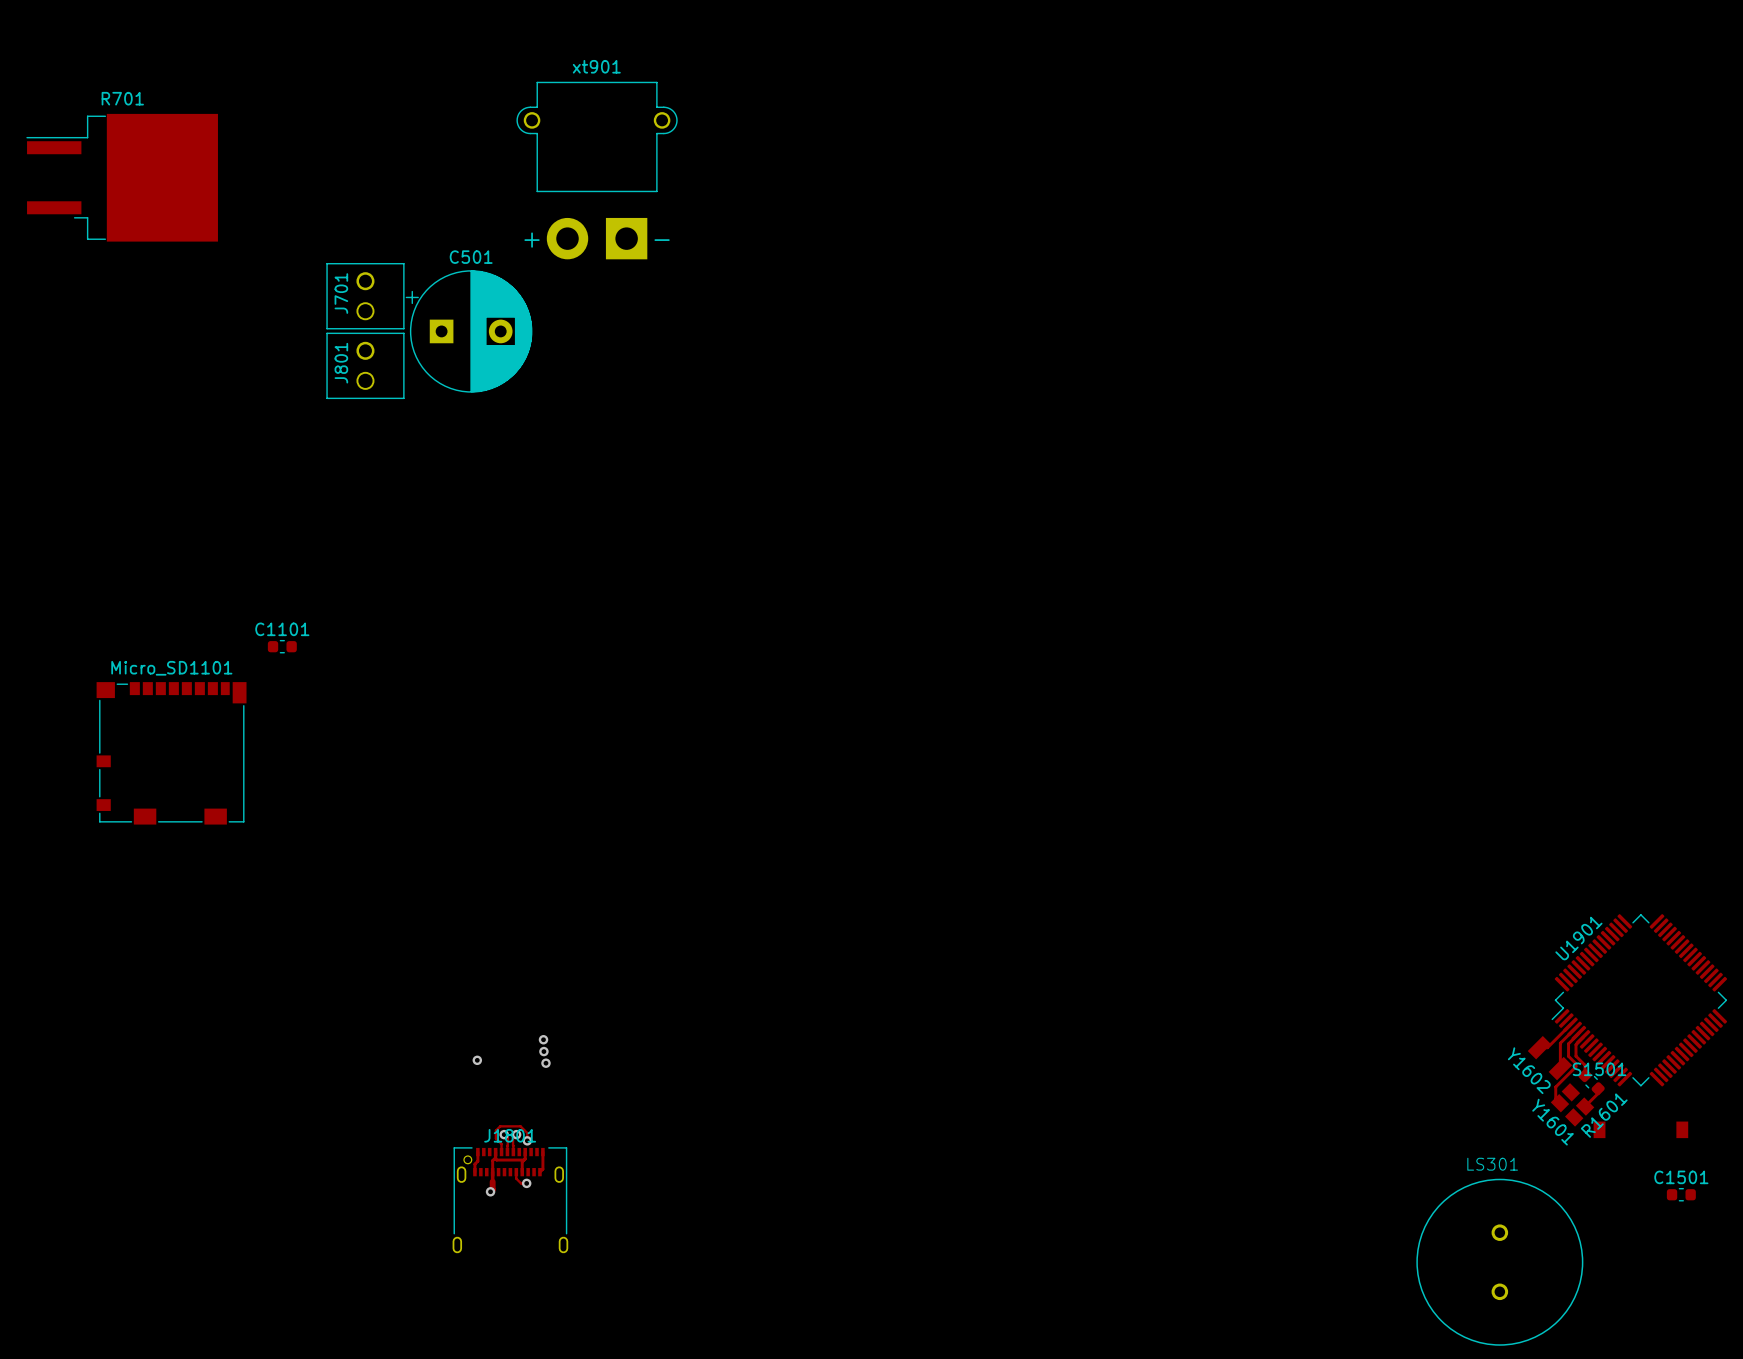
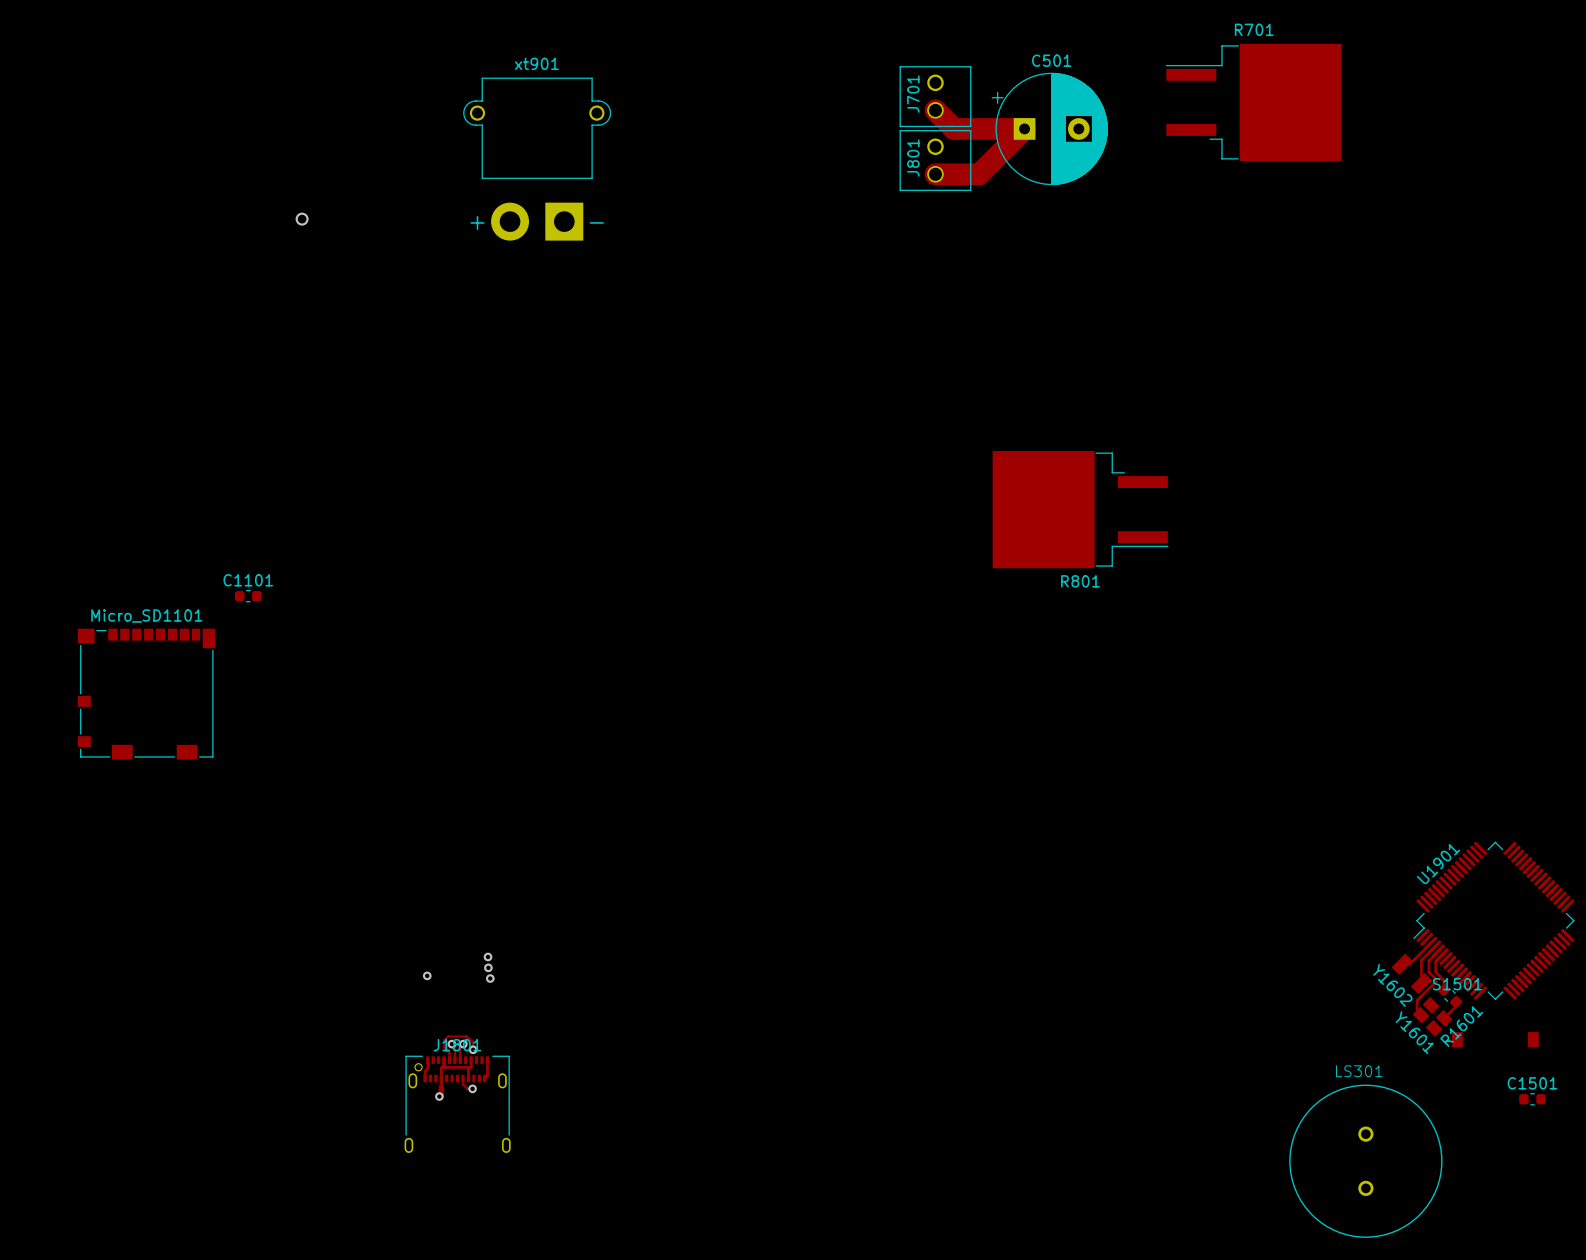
track: none -> (935, 110) (954, 128) (1024, 128) (979, 174) (935, 174)
R701 position: (122, 177) -> (1253, 102)
via: none -> (302, 219)
J701 position: (365, 296) -> (935, 96)
C501 position: (469, 331) -> (1049, 128)
J801 position: (365, 365) -> (935, 160)
R801: none -> (1080, 509)

